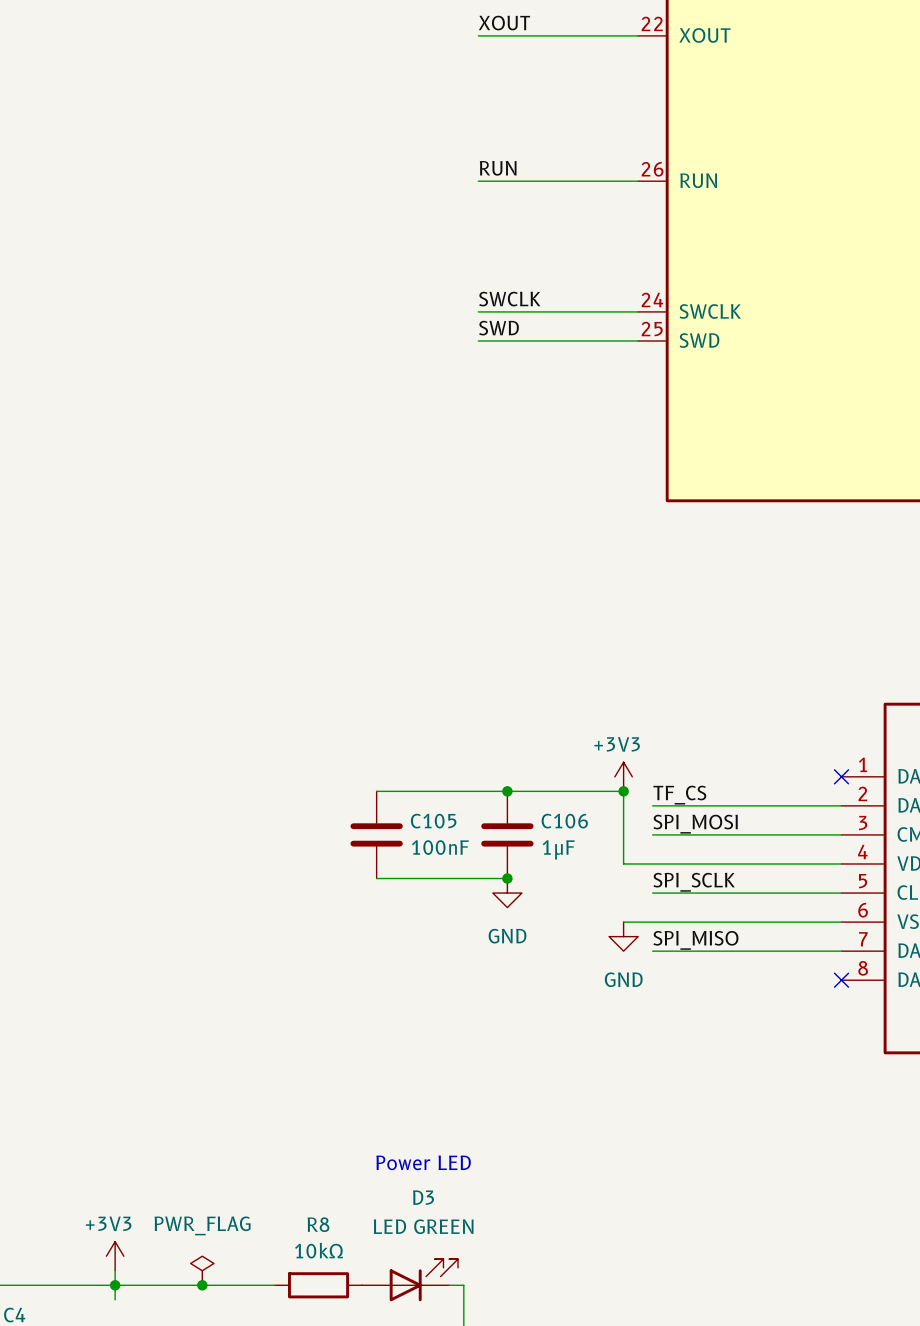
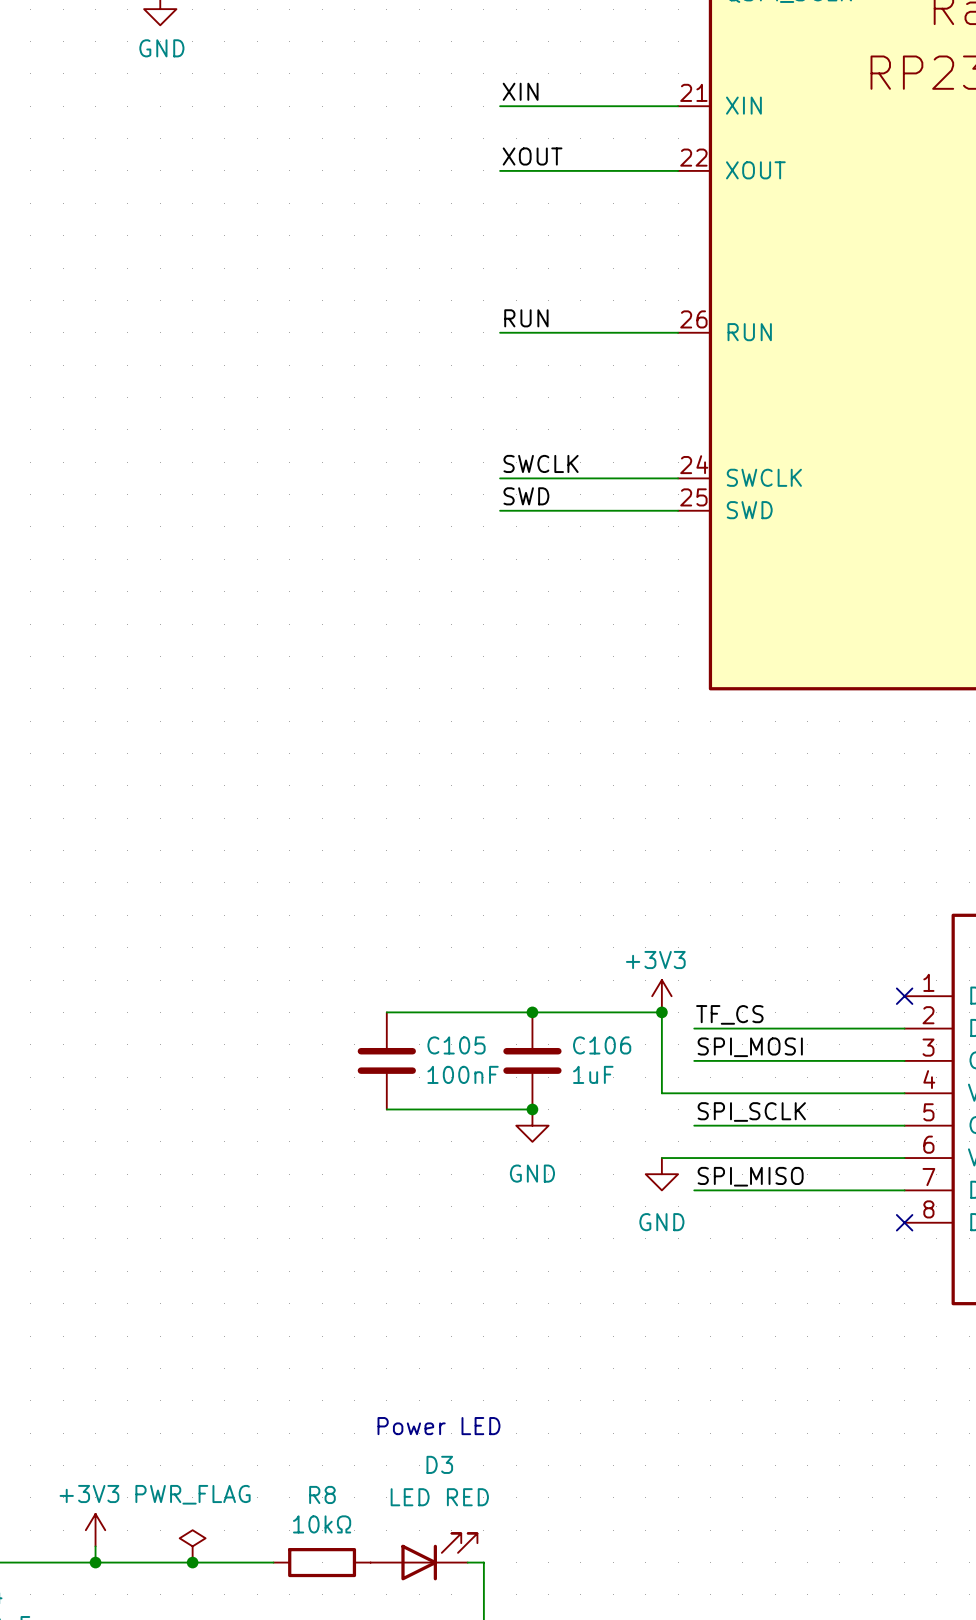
C106 value: 1μF (558, 849) -> 1uF (593, 1074)
D3 value: LED GREEN (423, 1226) -> LED RED (439, 1497)
wire: (115, 1285) (115, 1299) -> none

